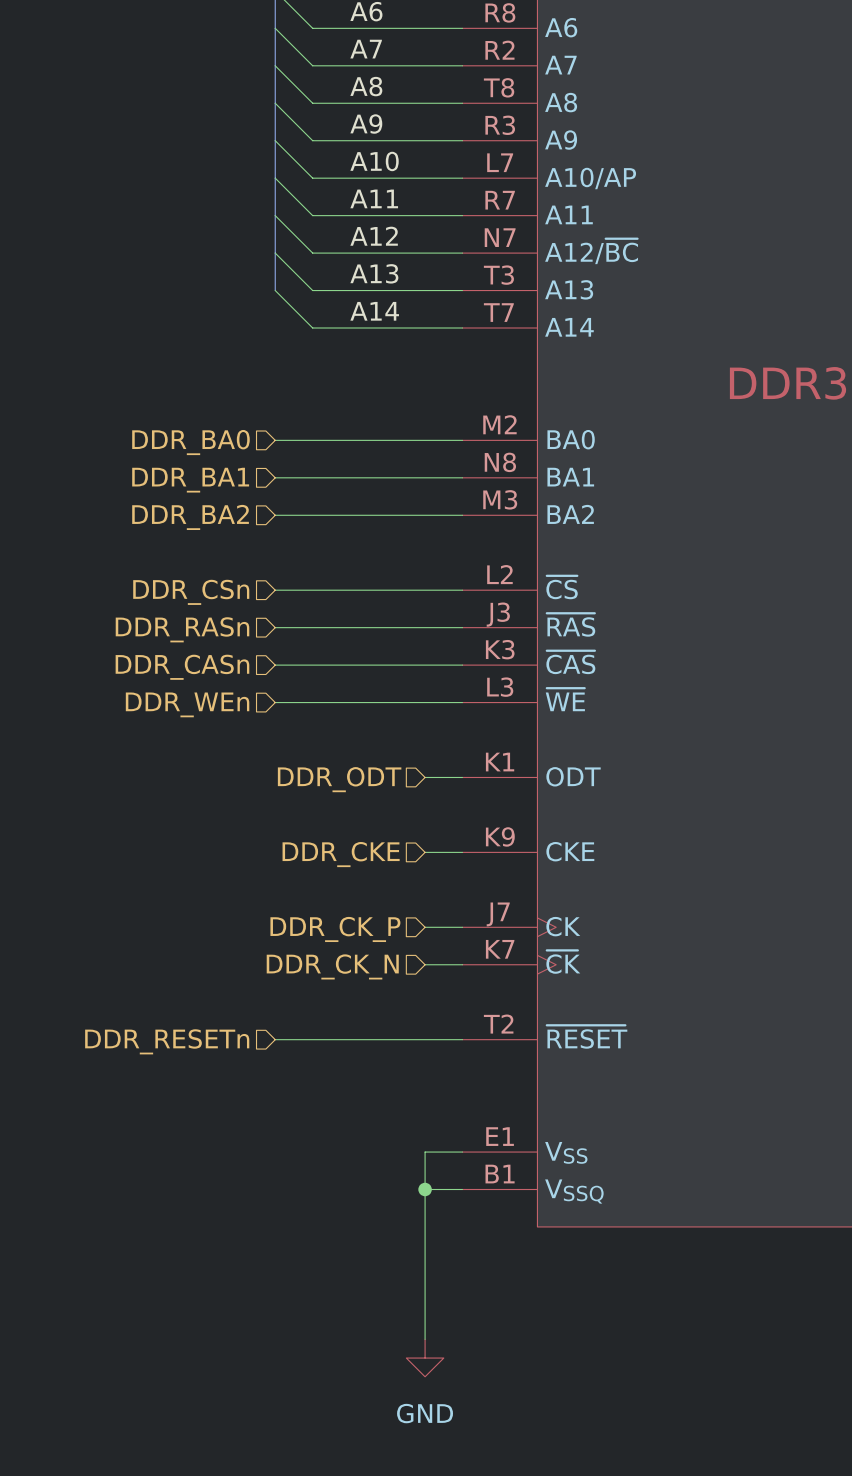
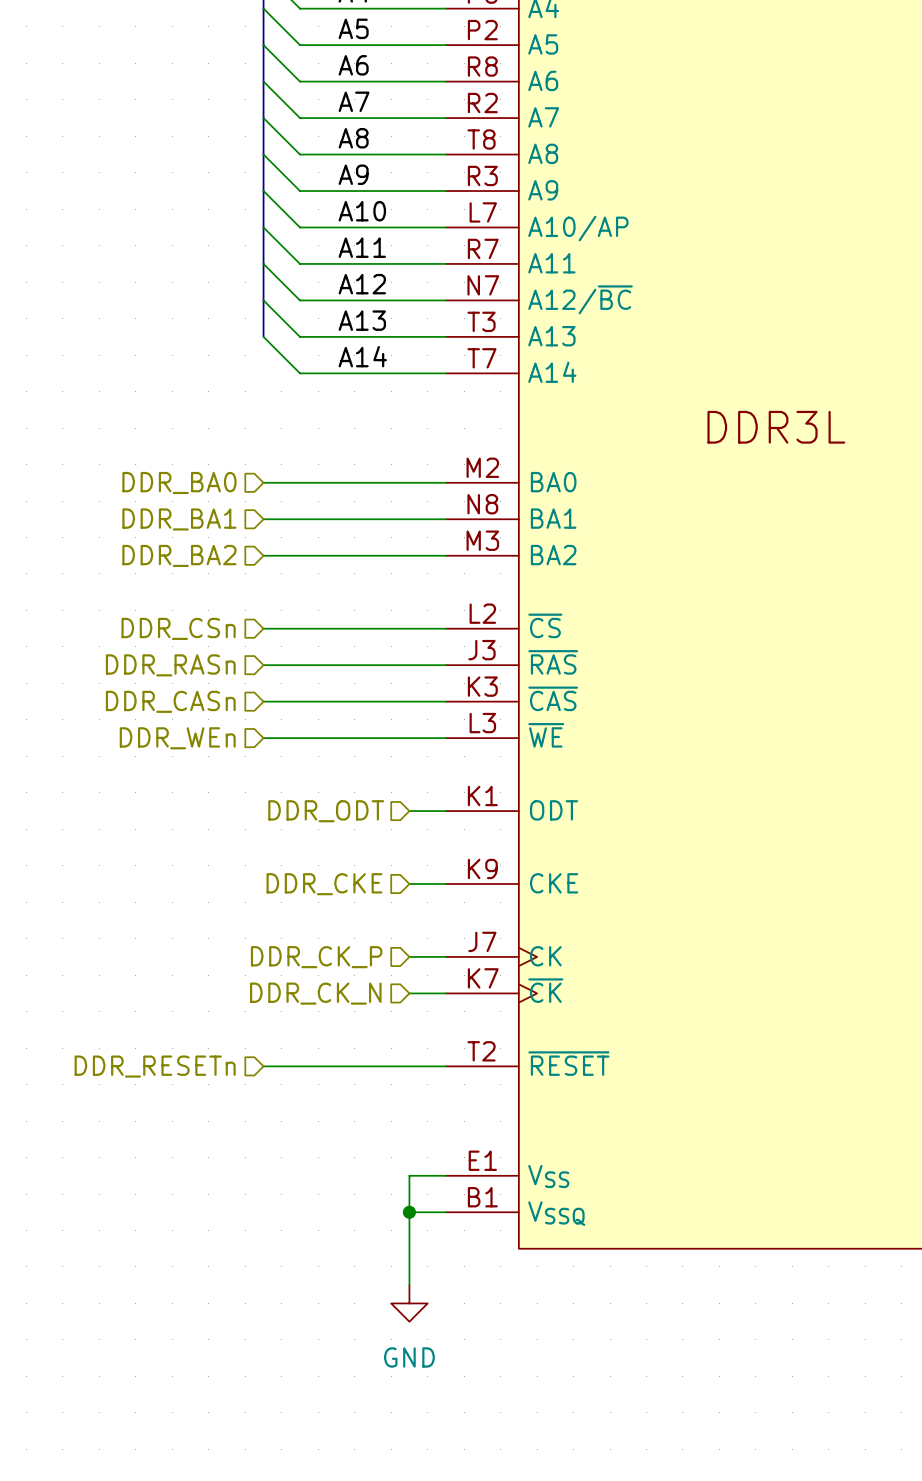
wire: (425, 1264) (425, 1339) -> none
power symbol position: GND (425, 1358) -> GND (409, 1303)

